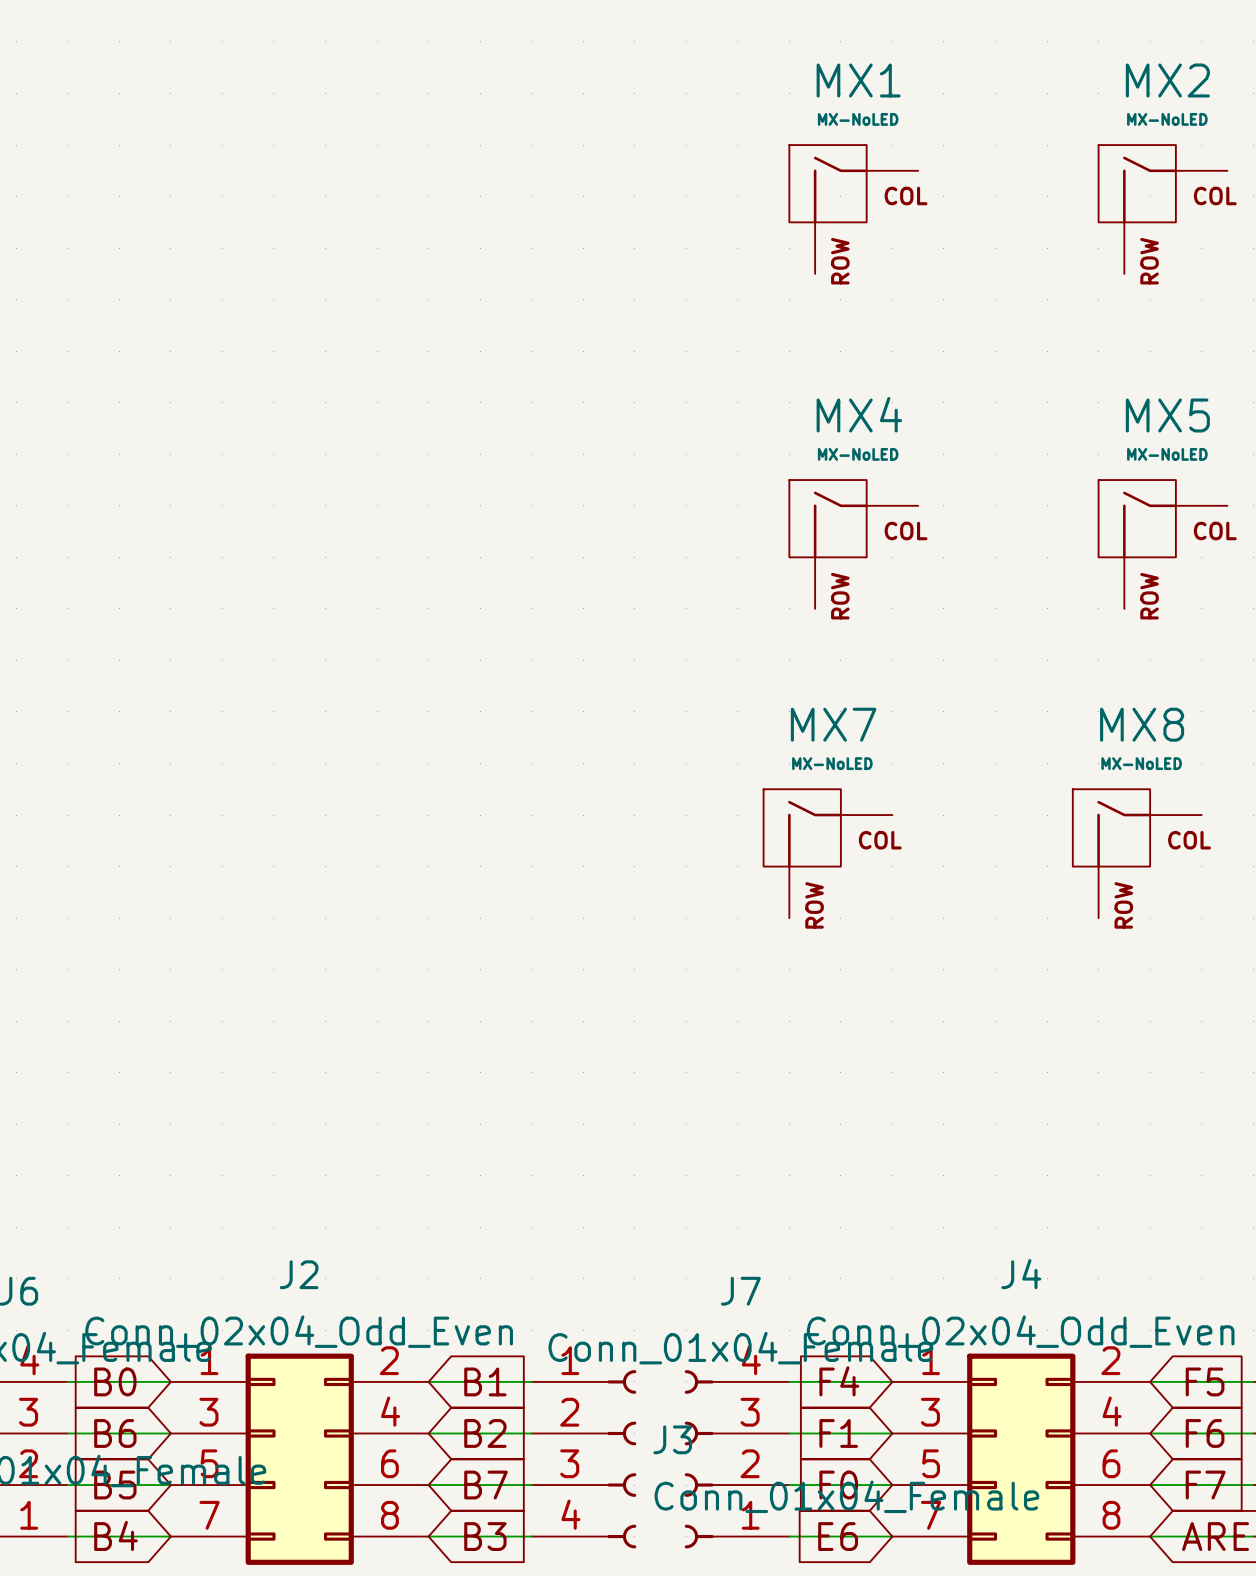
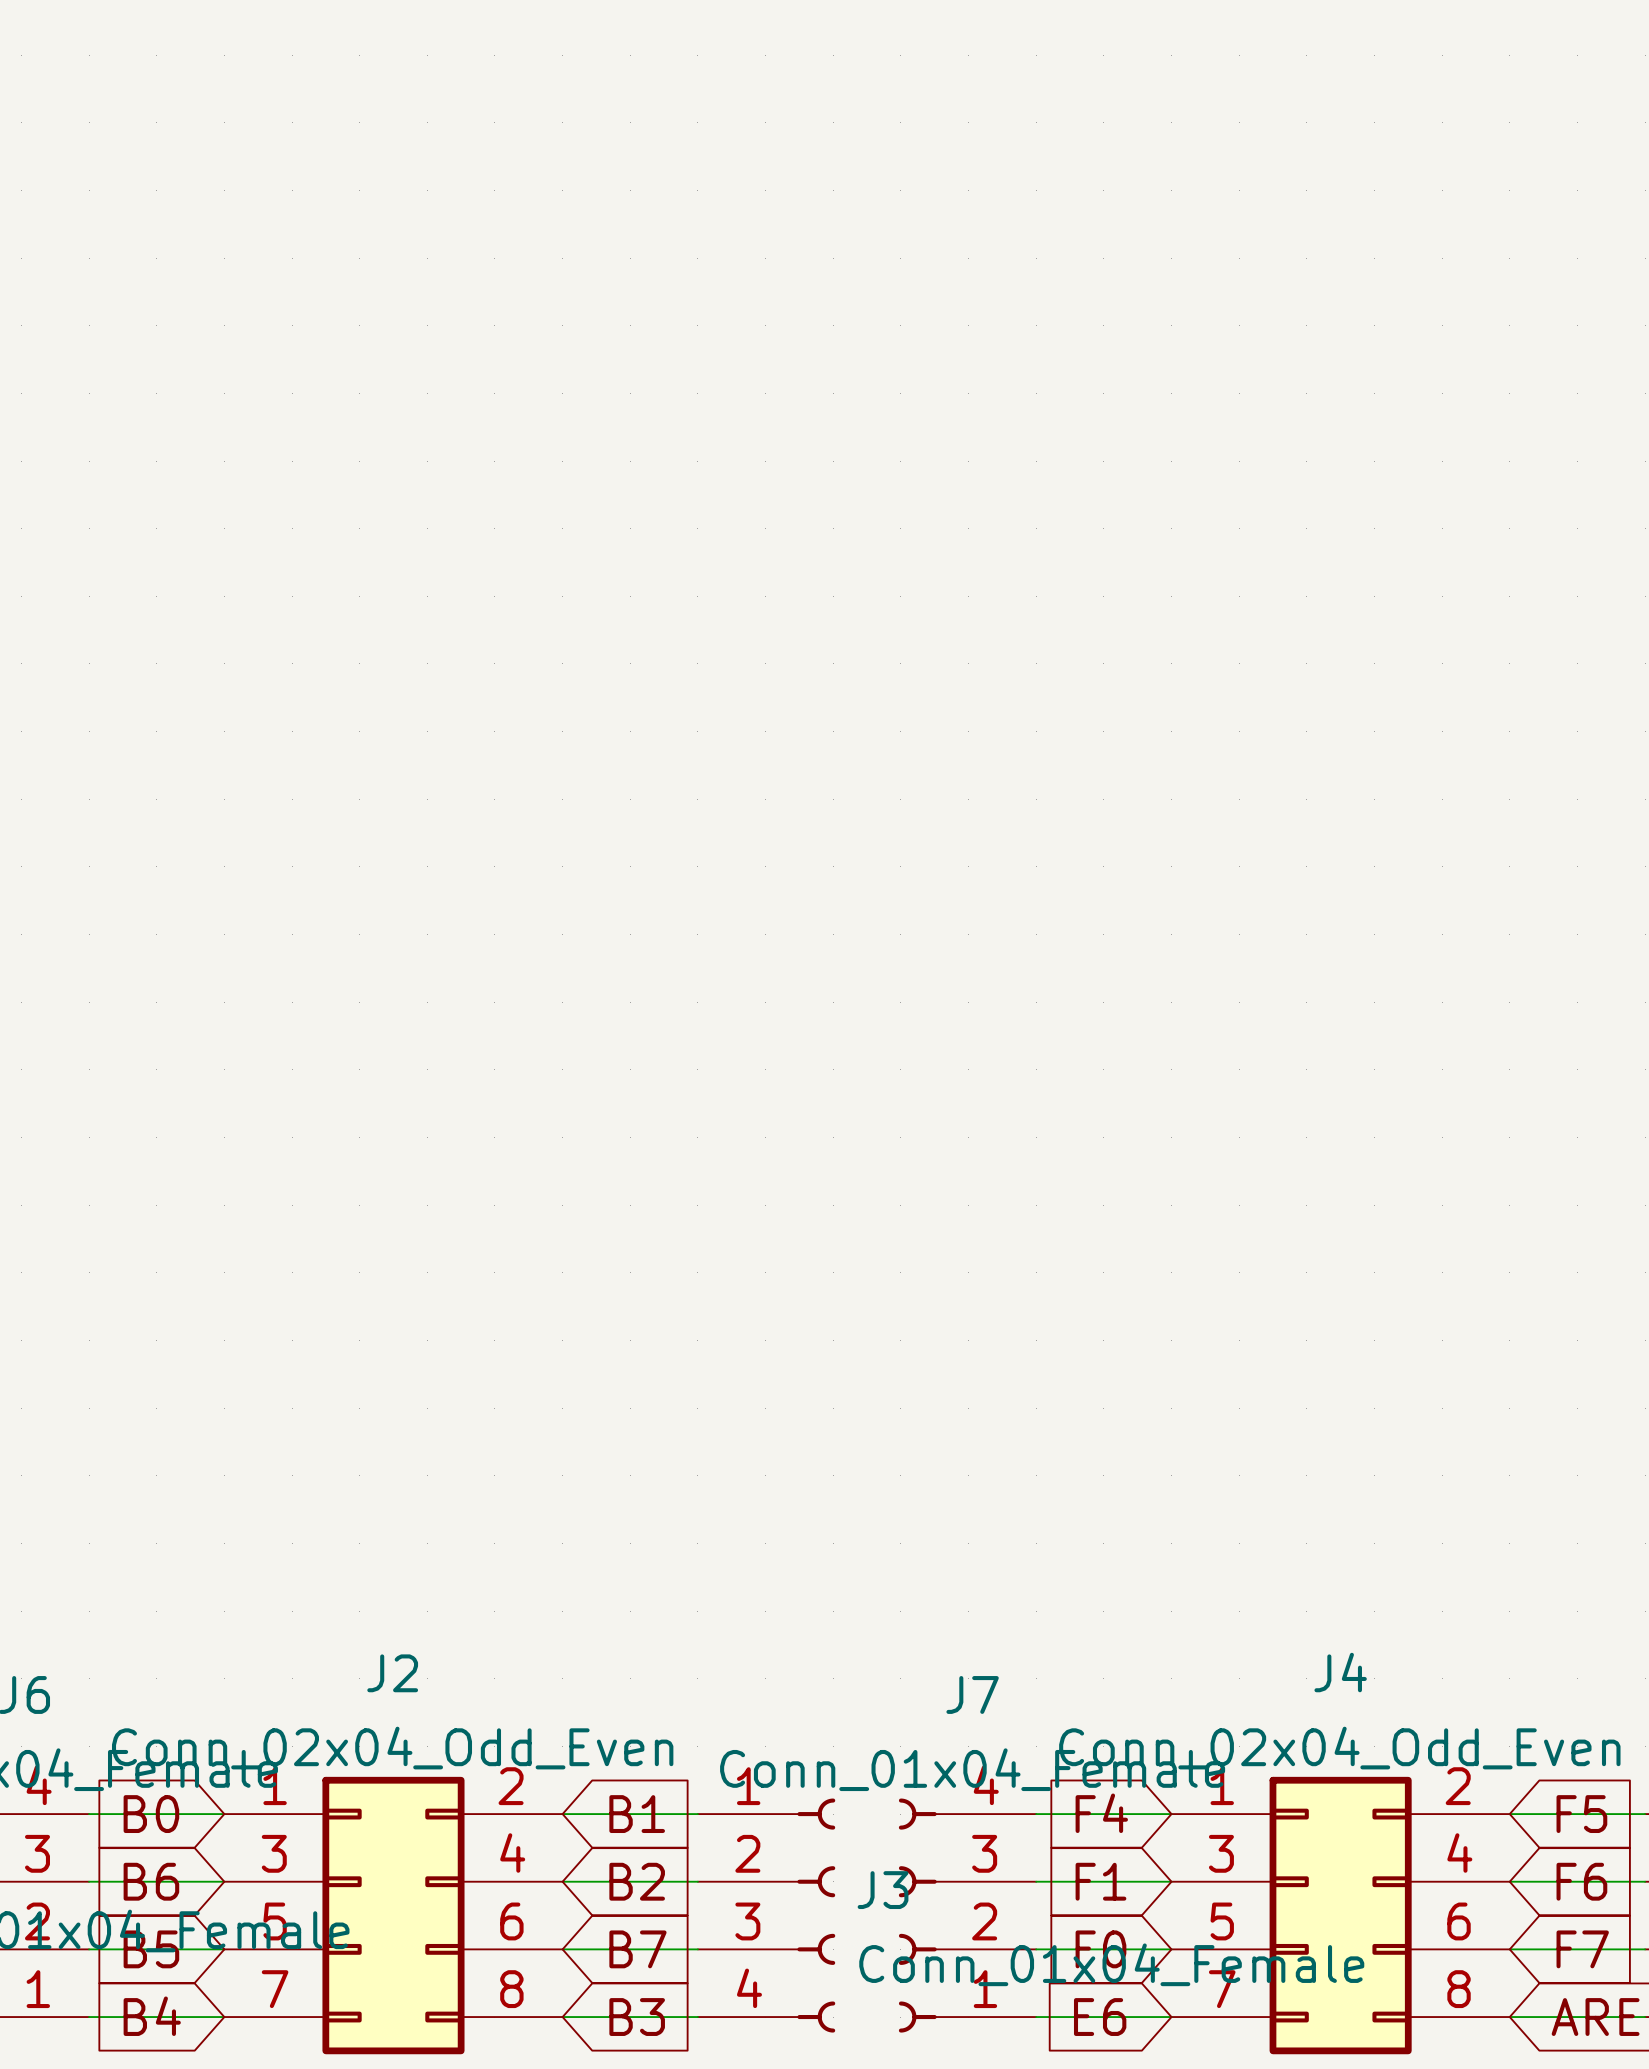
MX1: MX-NoLED (853, 209) -> none
MX2: MX-NoLED (1163, 209) -> none
MX4: MX-NoLED (853, 544) -> none
MX5: MX-NoLED (1163, 544) -> none
MX7: MX-NoLED (828, 853) -> none
MX8: MX-NoLED (1137, 853) -> none

